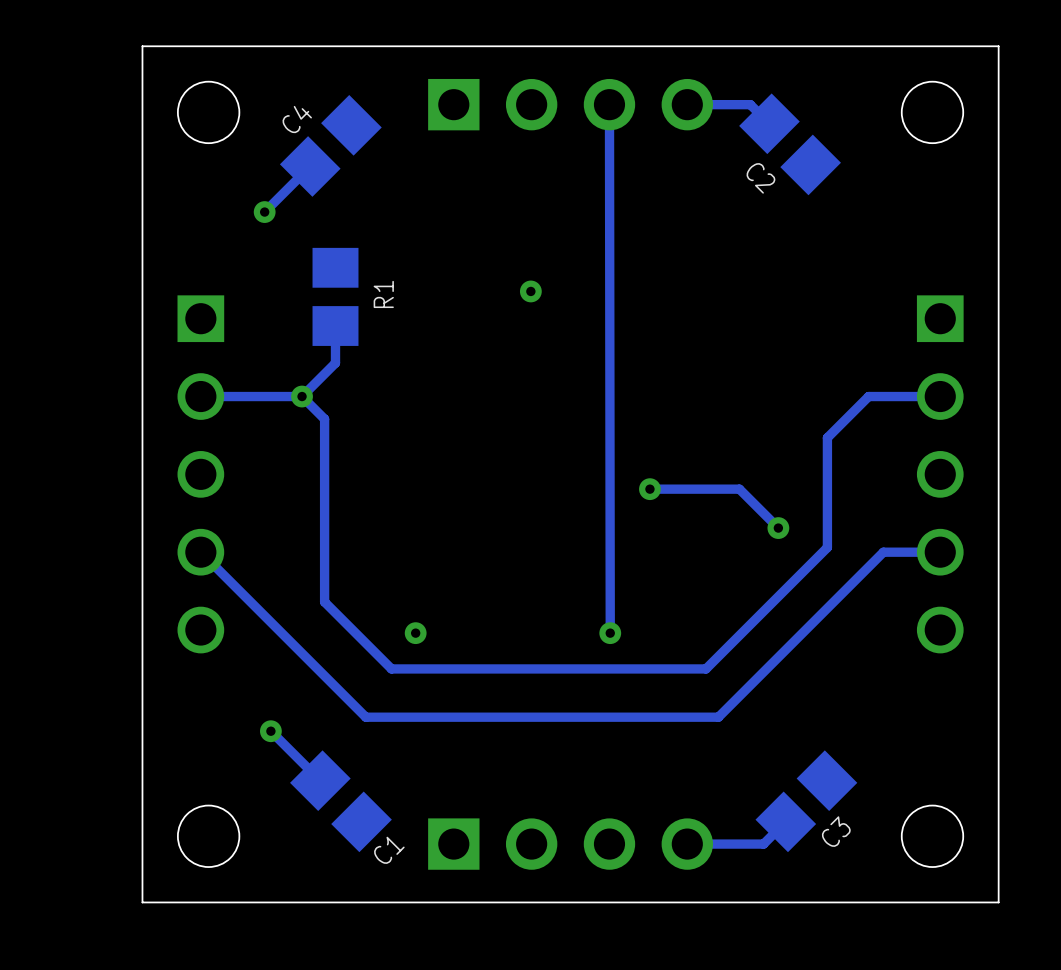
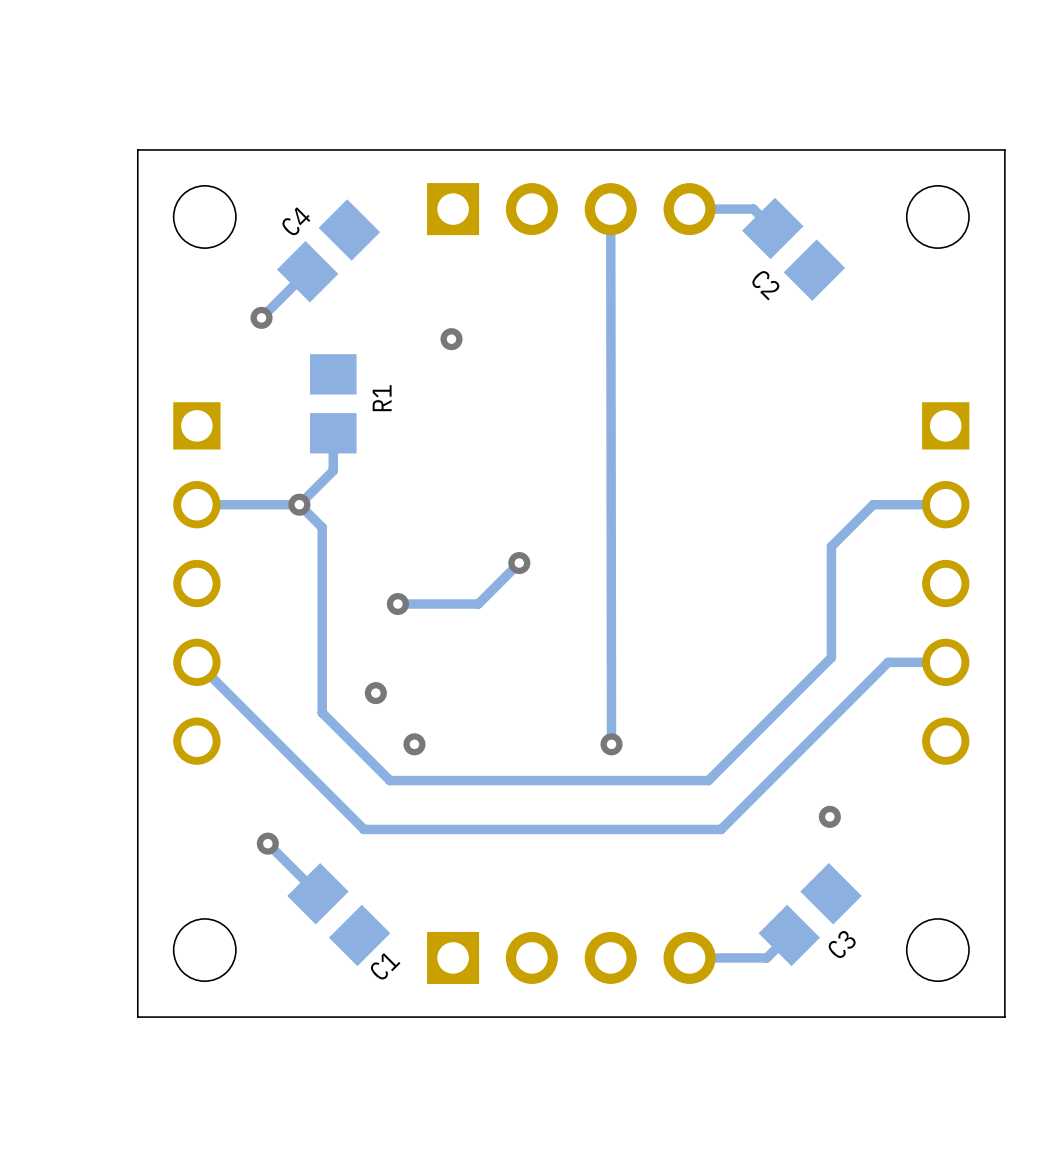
via: none -> (451, 339)
via: (530, 291) -> none
track: none -> (519, 563) (478, 604) (397, 604)
via: none -> (519, 563)
track: (649, 489) (739, 489) (778, 528) -> none
via: (649, 489) -> none
via: none -> (397, 604)
via: (778, 528) -> none
via: none -> (375, 693)
via: none -> (829, 816)

